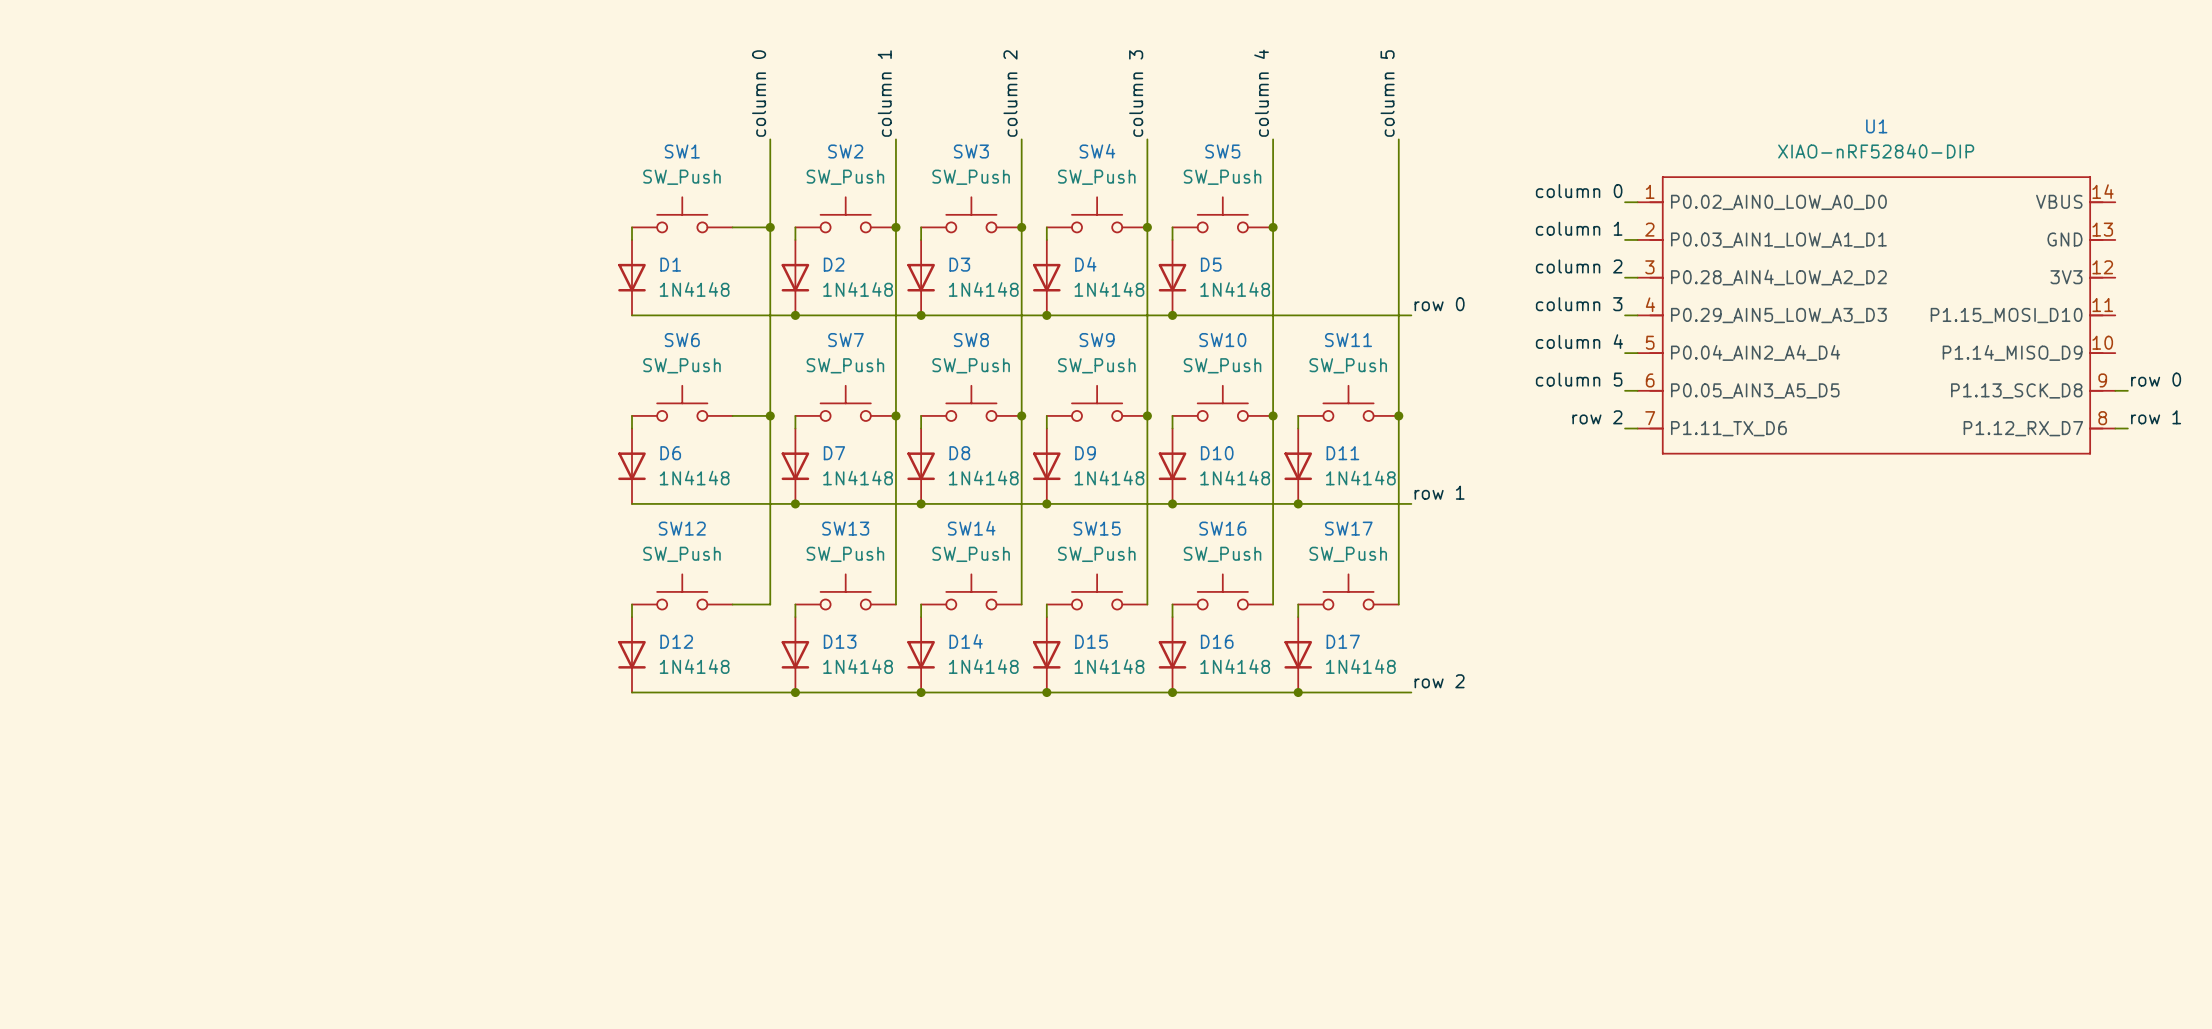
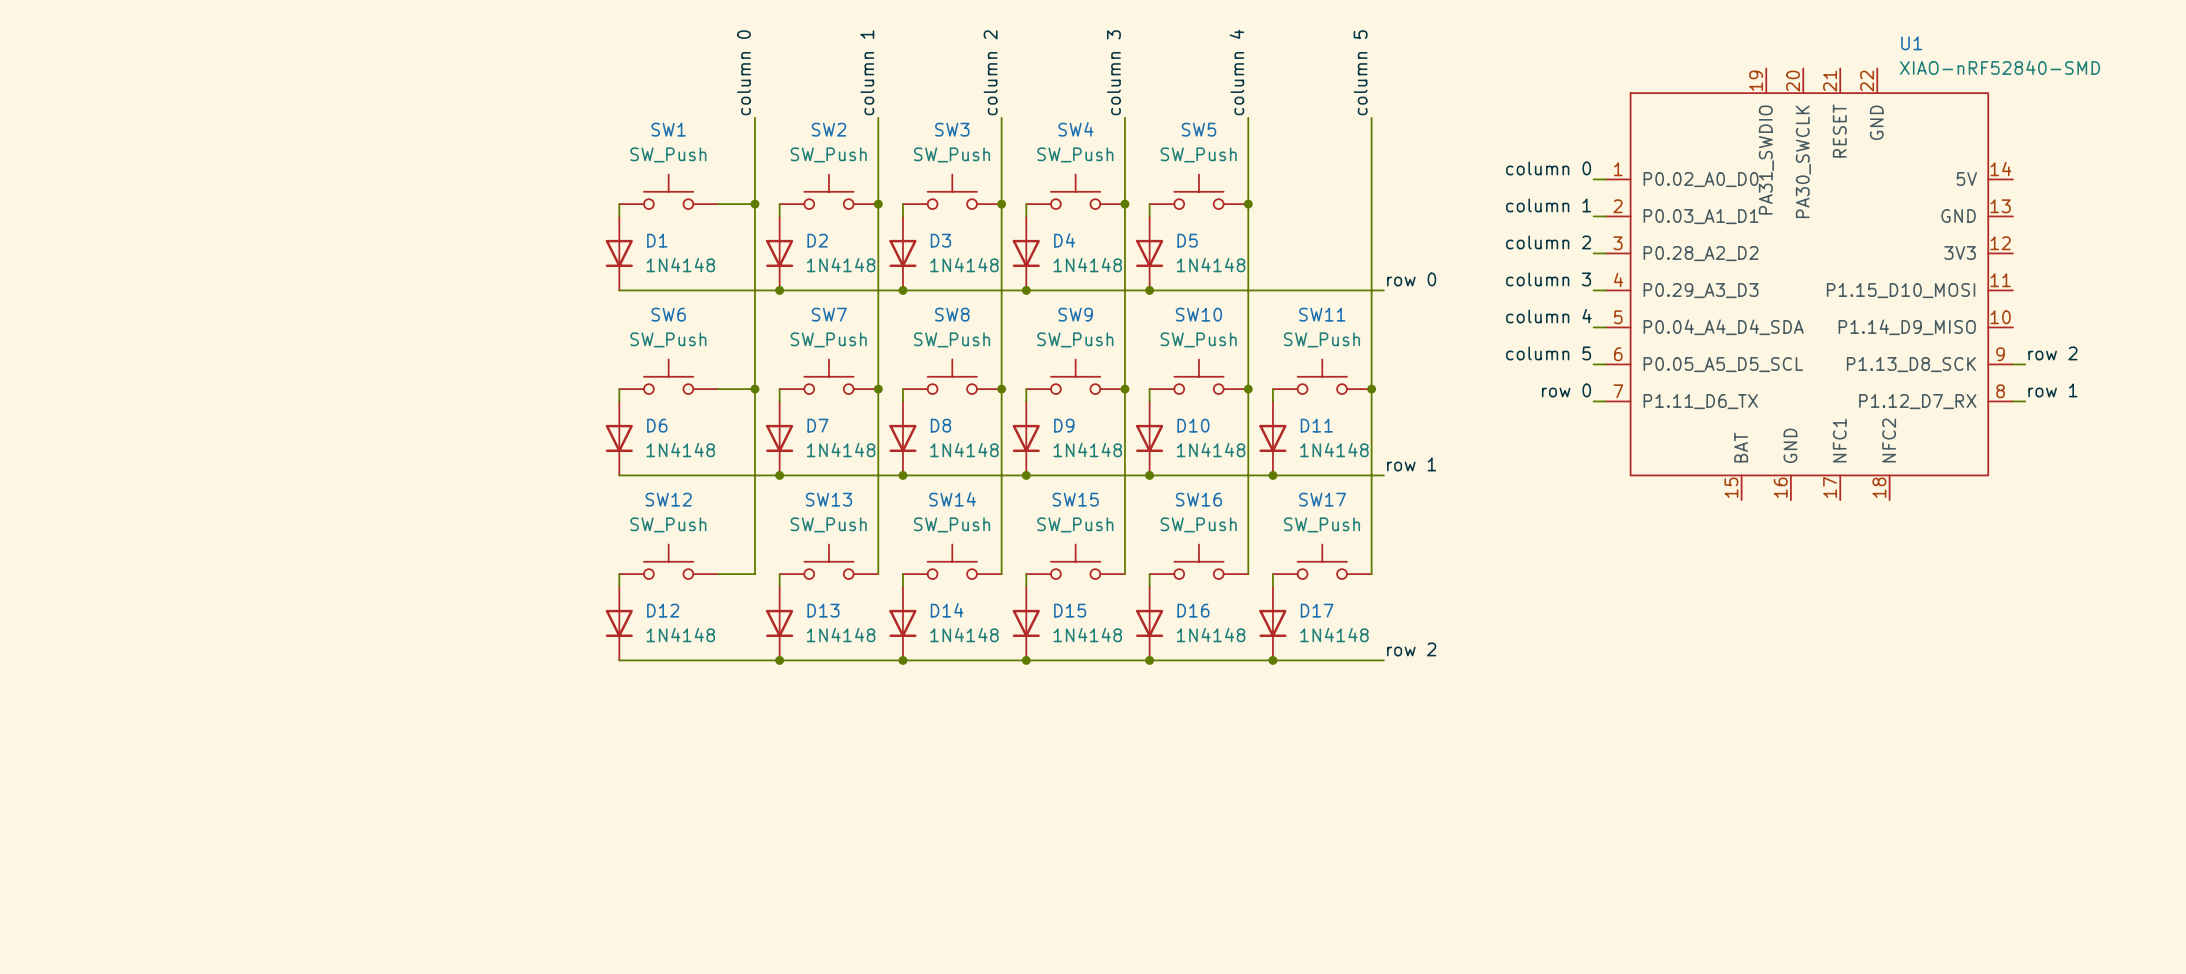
U1 name position: U1 (1876, 126) -> U1 (1911, 43)
U1 value: XIAO-nRF52840-DIP (1876, 151) -> XIAO-nRF52840-SMD (2000, 67)
U1 symbol: [1637, 176, 2116, 455] -> [1605, 68, 2013, 501]
label: row 0 (2156, 379) -> row 2 (2052, 353)
wire: (2115, 390) (2127, 390) -> (2012, 364) (2025, 364)
label: row 2 (1597, 417) -> row 0 (1566, 390)
label position: row 1 (2156, 417) -> row 1 (2052, 390)
wire: (2115, 428) (2127, 428) -> (2012, 401) (2025, 401)

